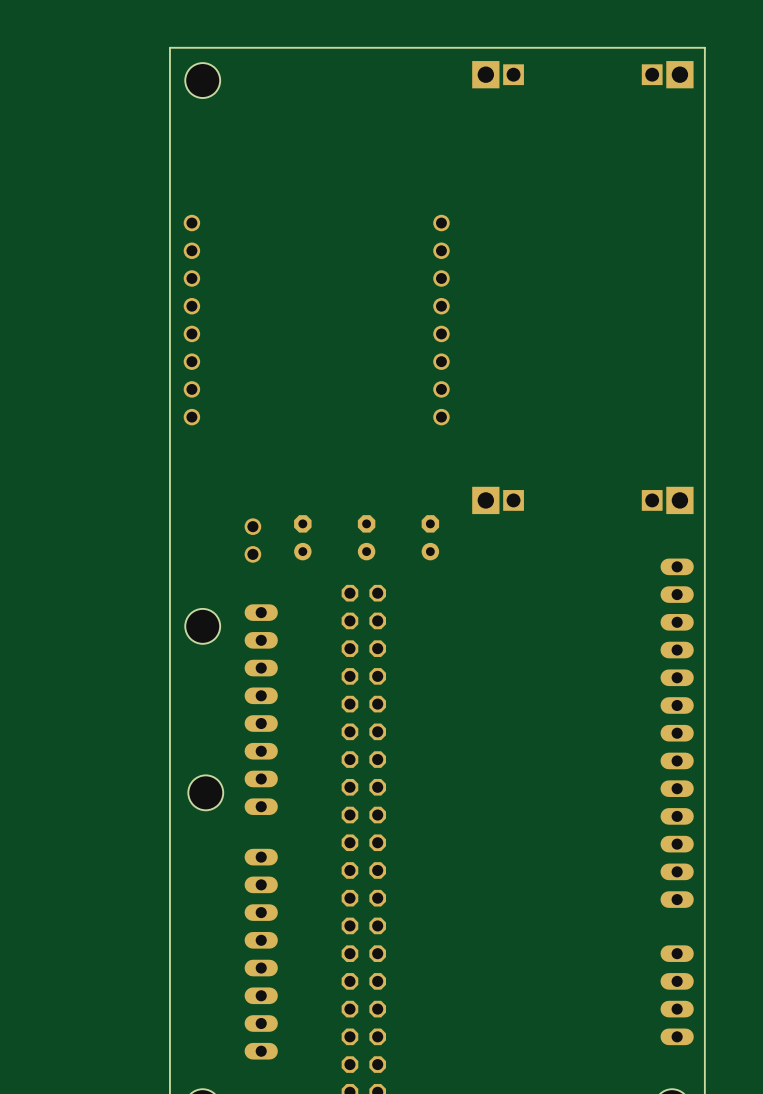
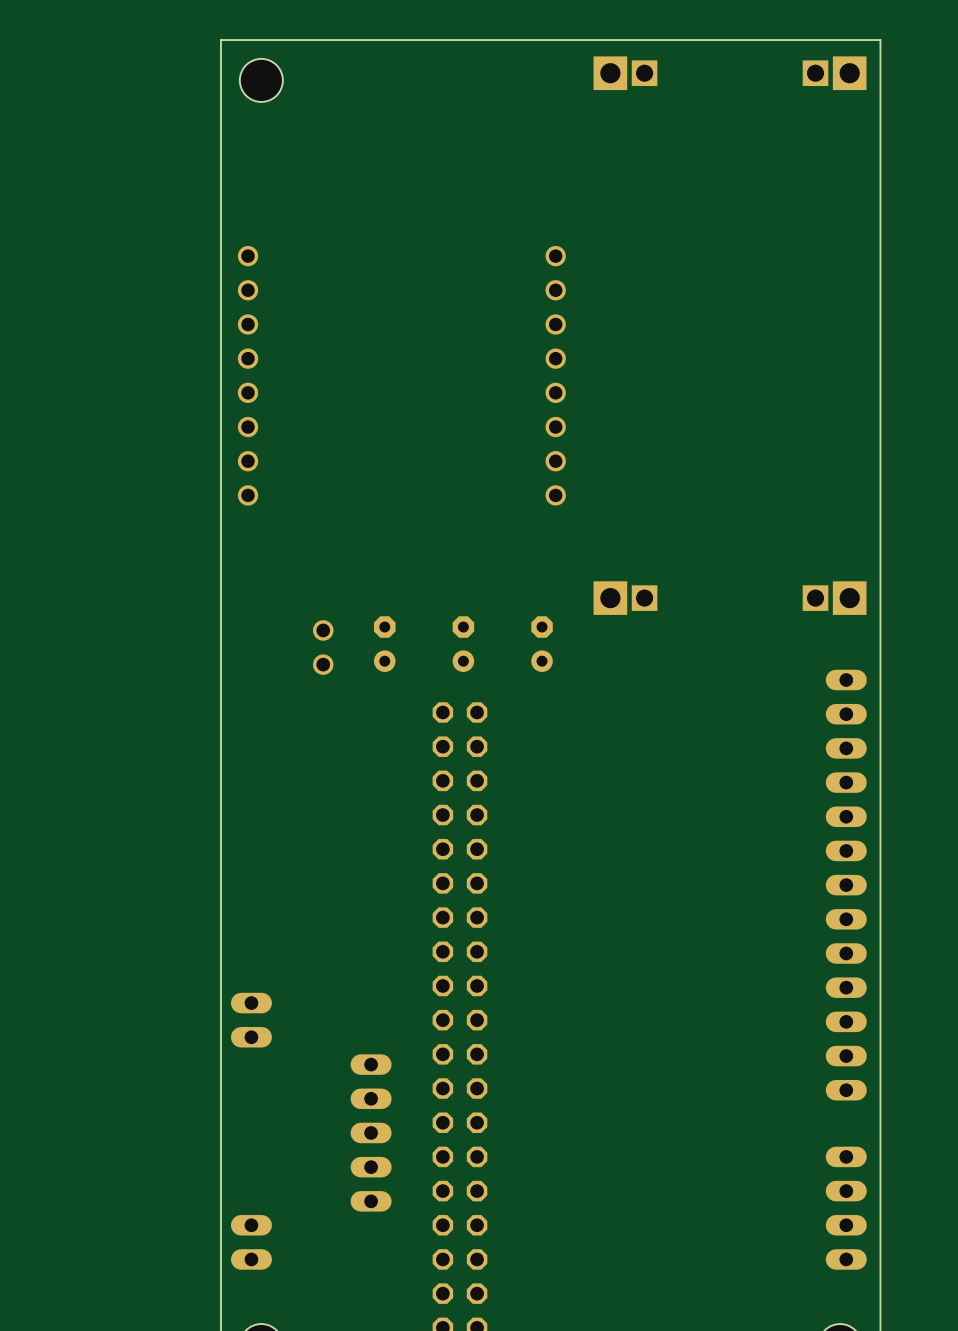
hole: (202, 626) -> none
part: (261, 709) -> none
hole: (205, 792) -> none
part: none -> (251, 1020)
part: none -> (371, 1132)
part: (261, 954) -> none
part: none -> (251, 1242)

